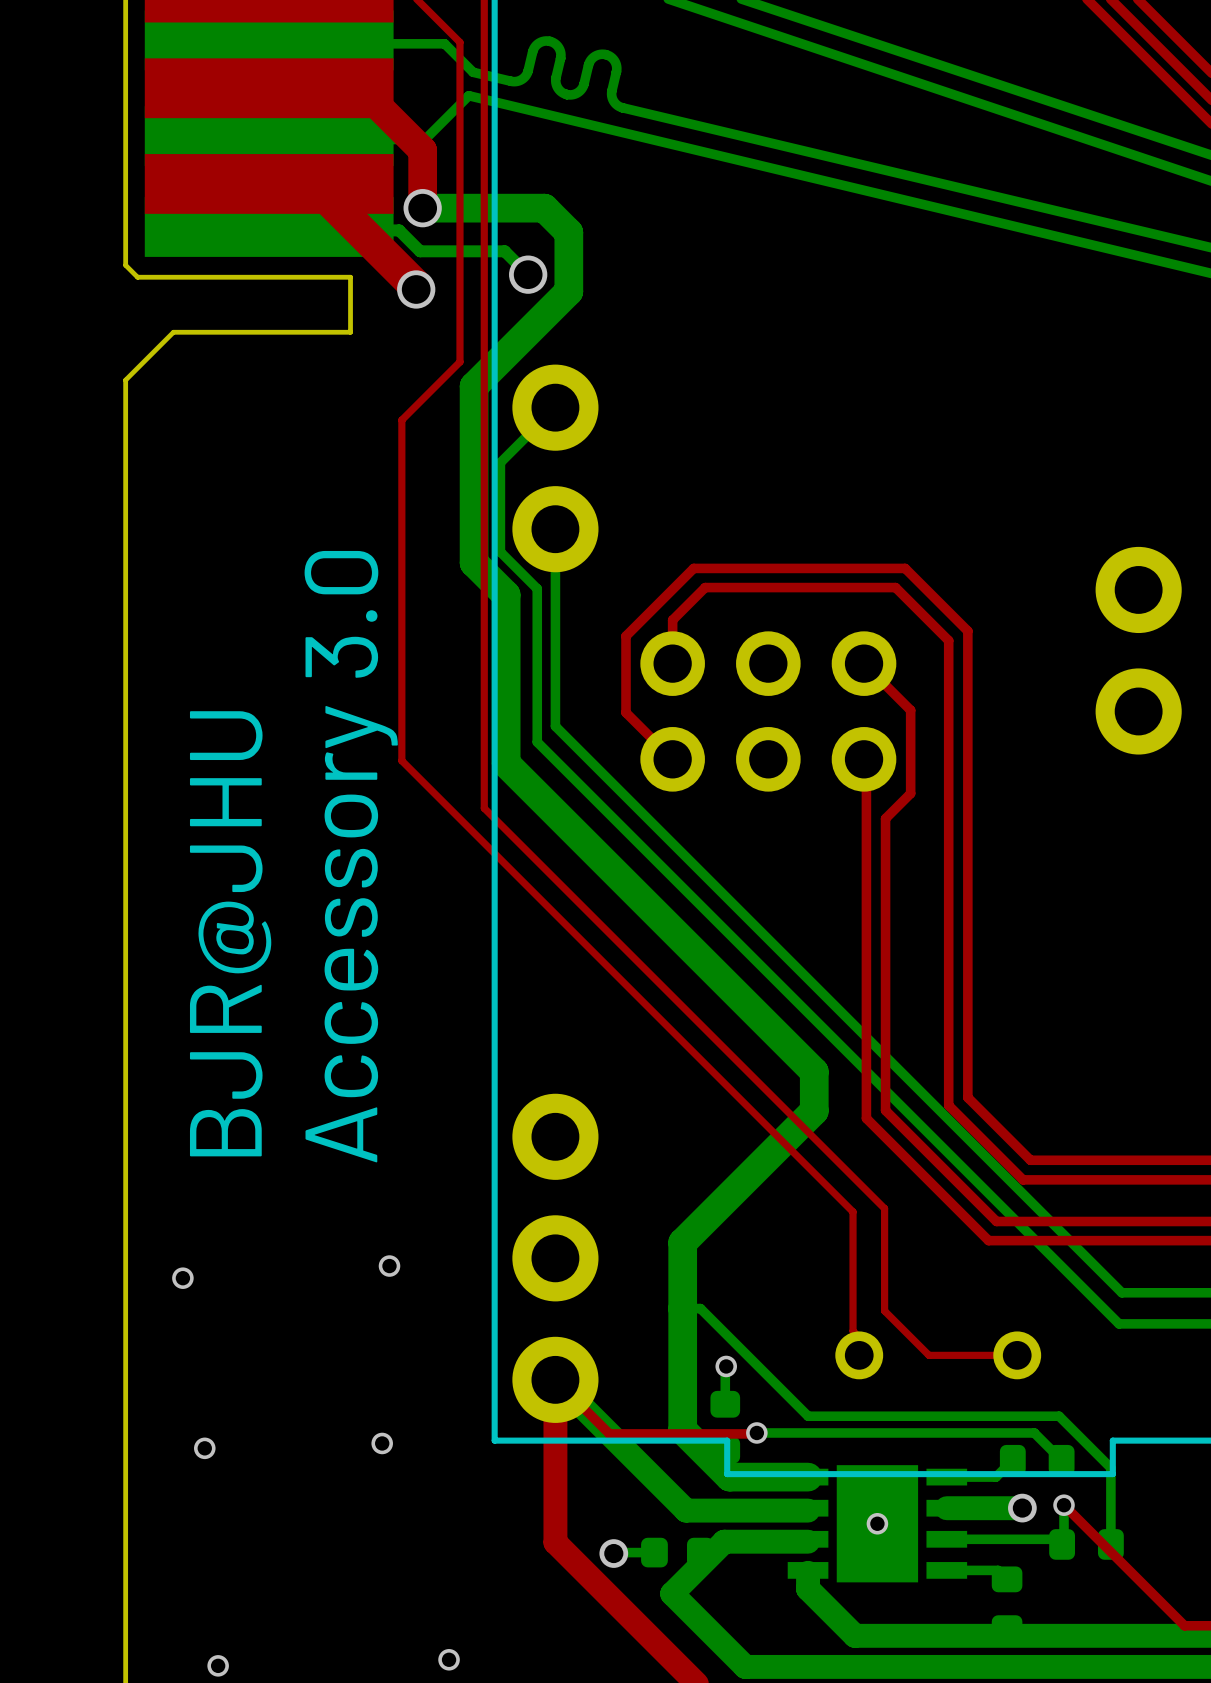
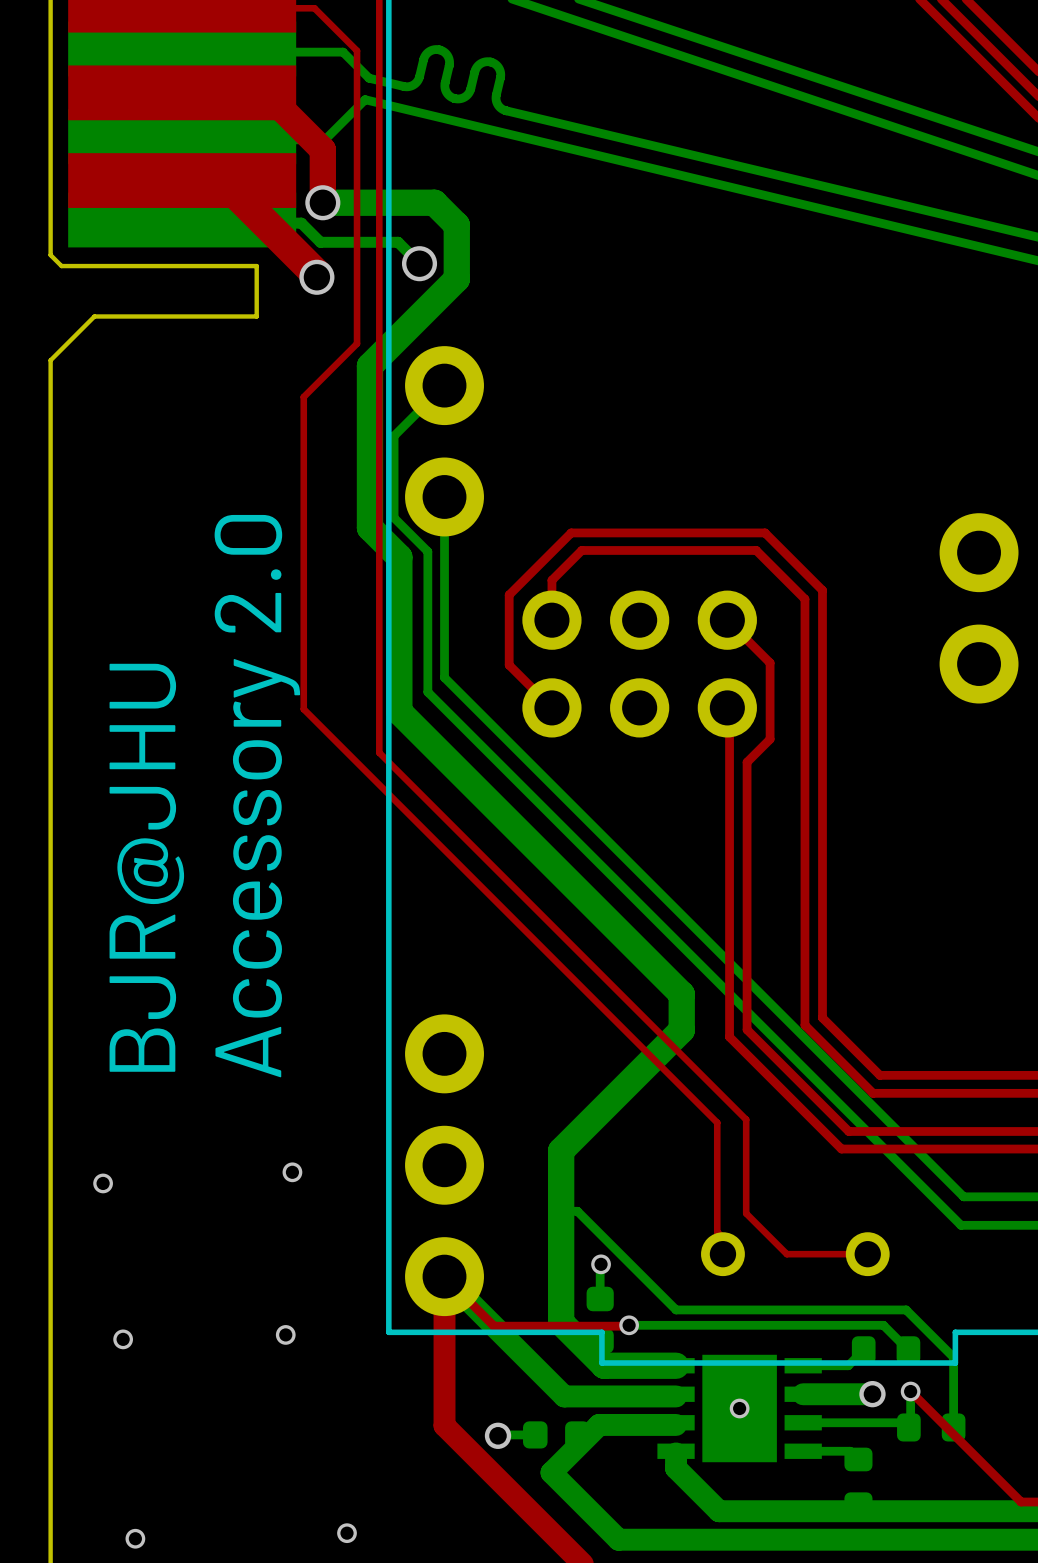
text: Accessory 3.0 (351, 856) -> Accessory 2.0 (257, 796)

